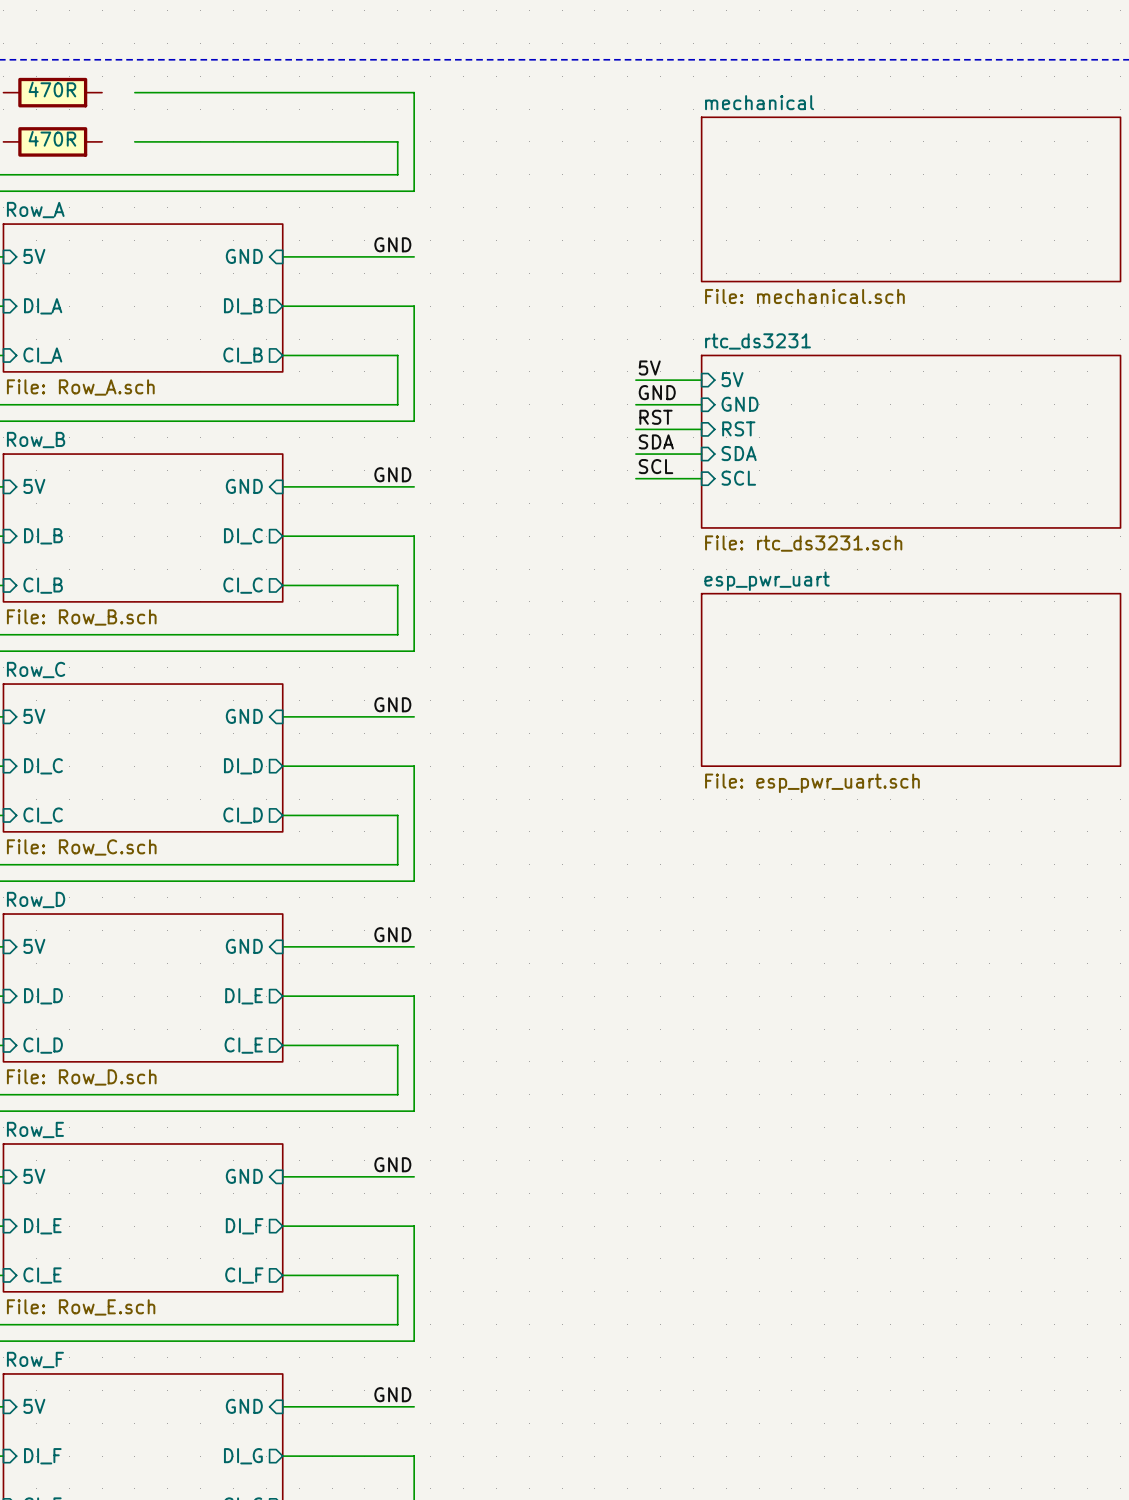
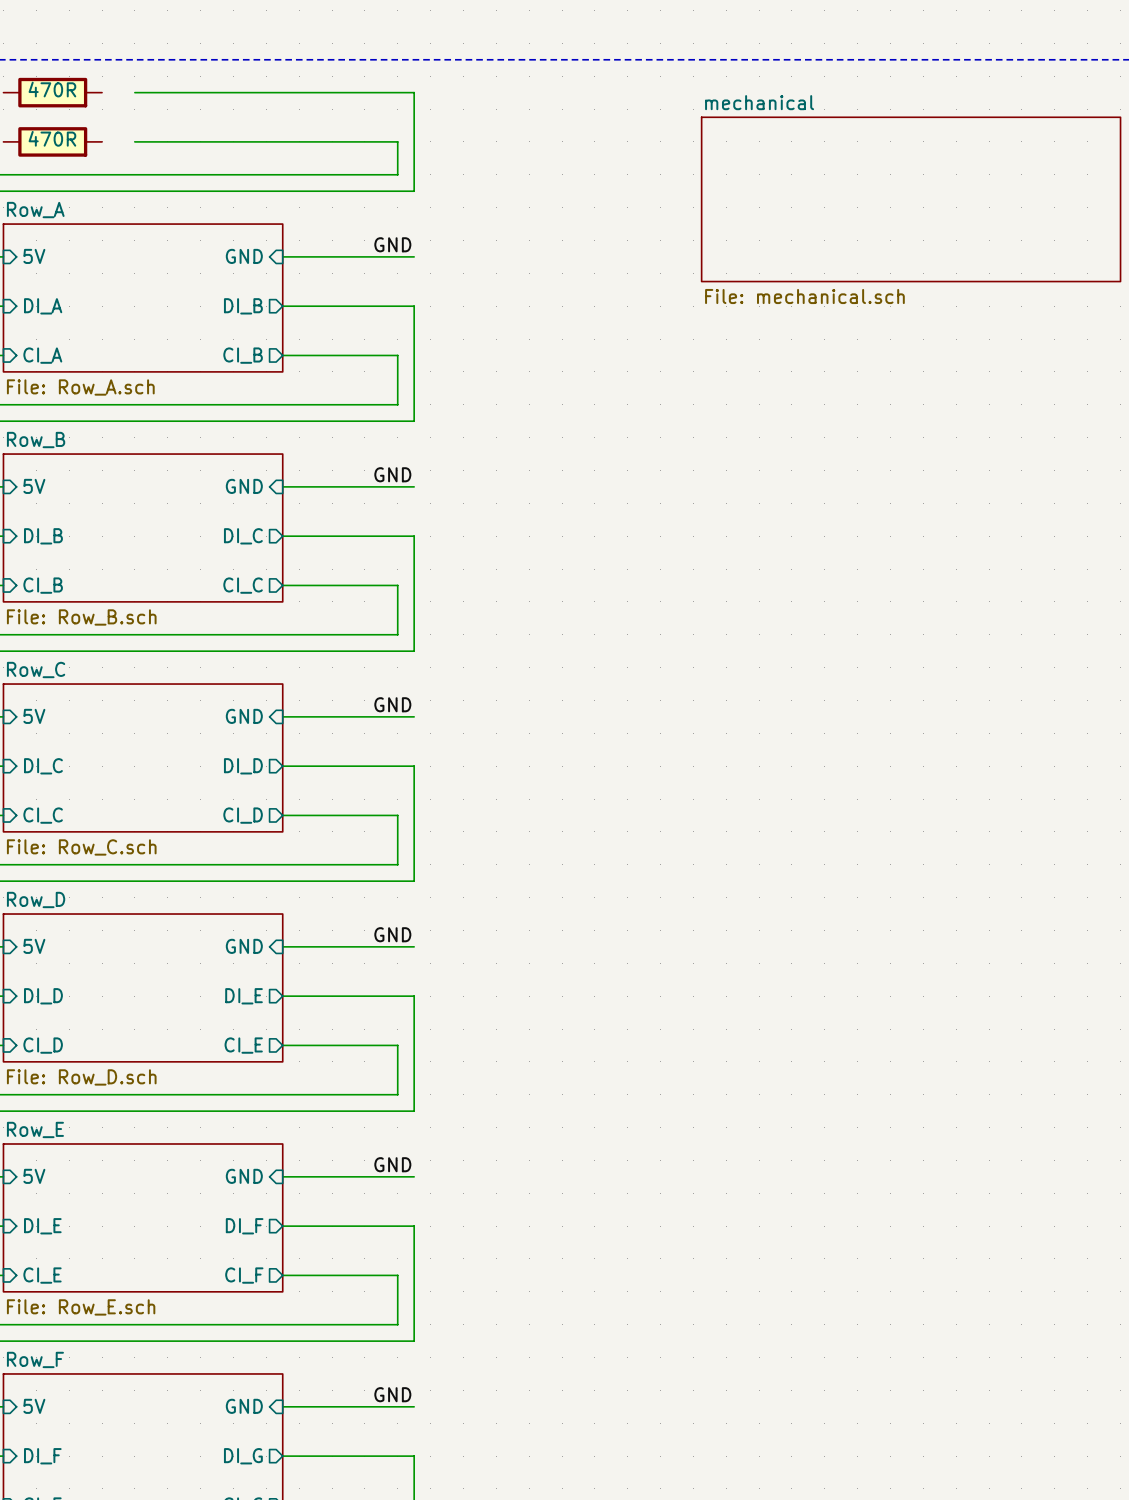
label: 5V (649, 367) -> none
sheet pin: 5V (732, 379) -> none
wire: (635, 380) (701, 380) -> none
label: GND (657, 392) -> none
wire: (635, 404) (701, 404) -> none
sheet pin: GND (740, 404) -> none
label: RST (655, 417) -> none
sheet pin: RST (738, 428) -> none
wire: (635, 429) (701, 429) -> none
label: SDA (656, 441) -> none
sheet rtc_ds3231: File: rtc_ds3231.sch (911, 441) -> none
sheet pin: SDA (739, 453) -> none
wire: (635, 454) (701, 454) -> none
label: SCL (655, 466) -> none
wire: (635, 478) (701, 478) -> none
sheet pin: SCL (738, 478) -> none
sheet esp_pwr_uart: File: esp_pwr_uart.sch (911, 679) -> none

